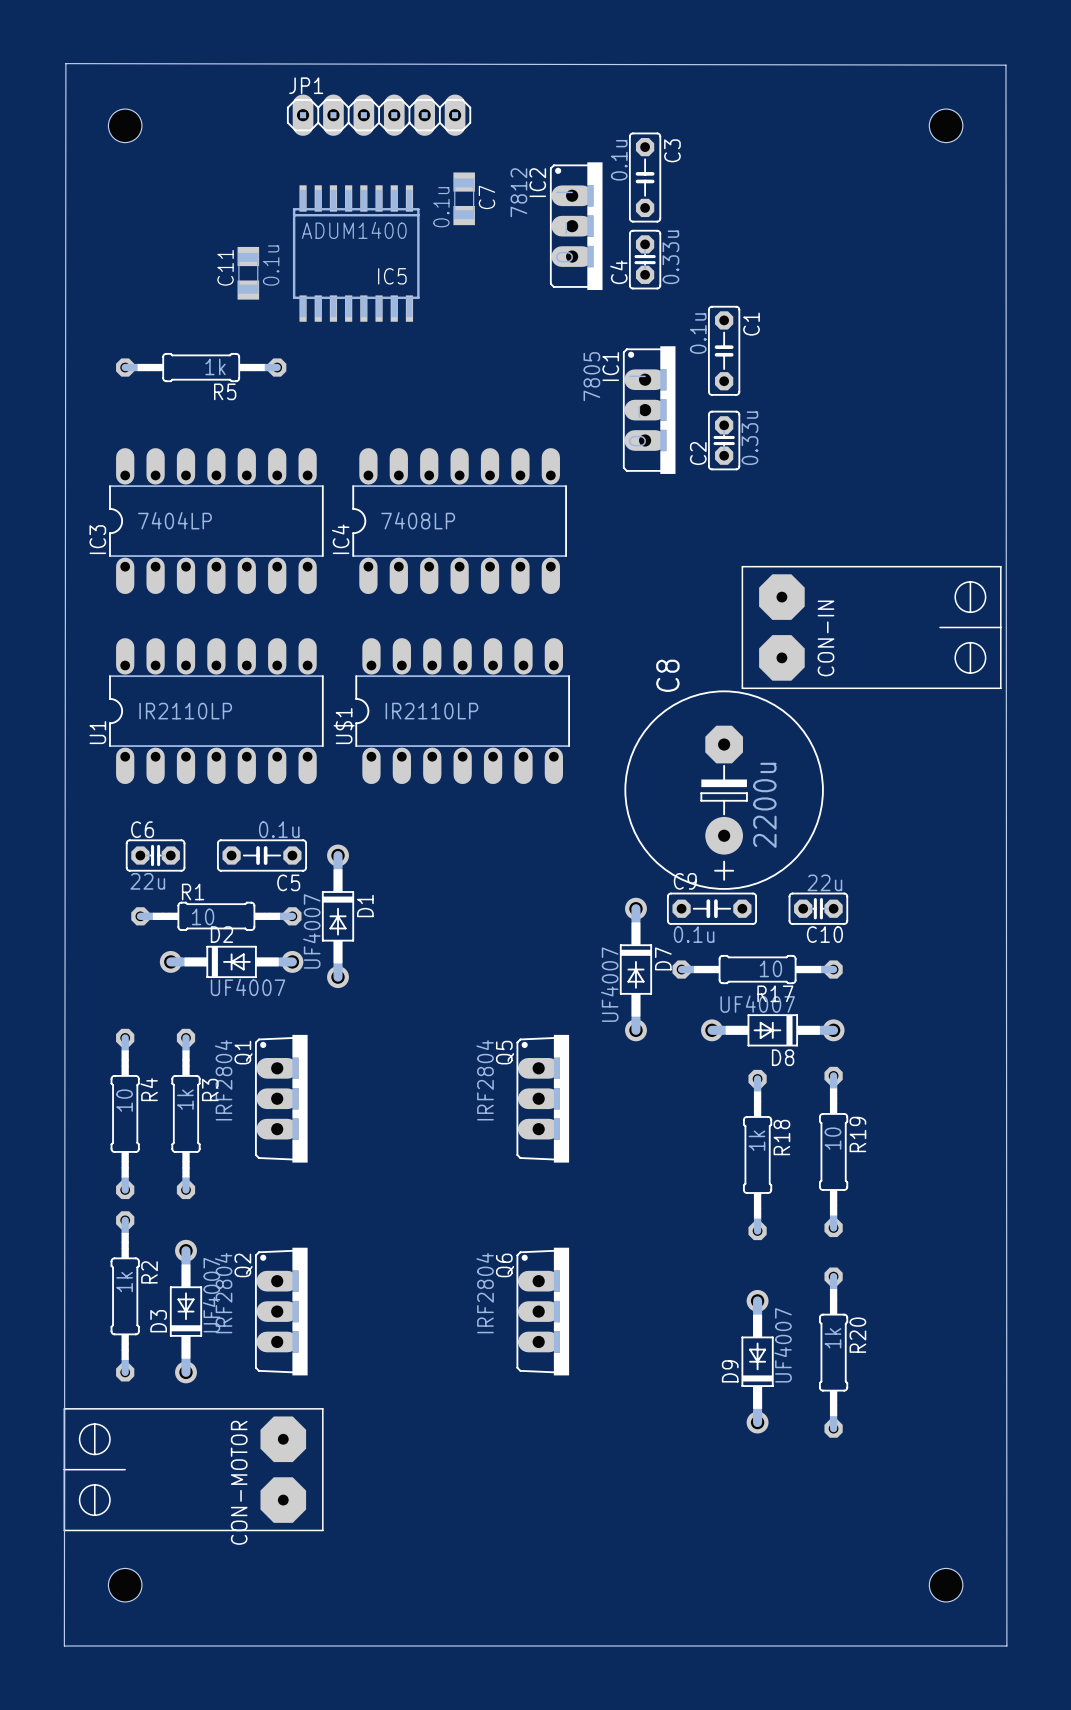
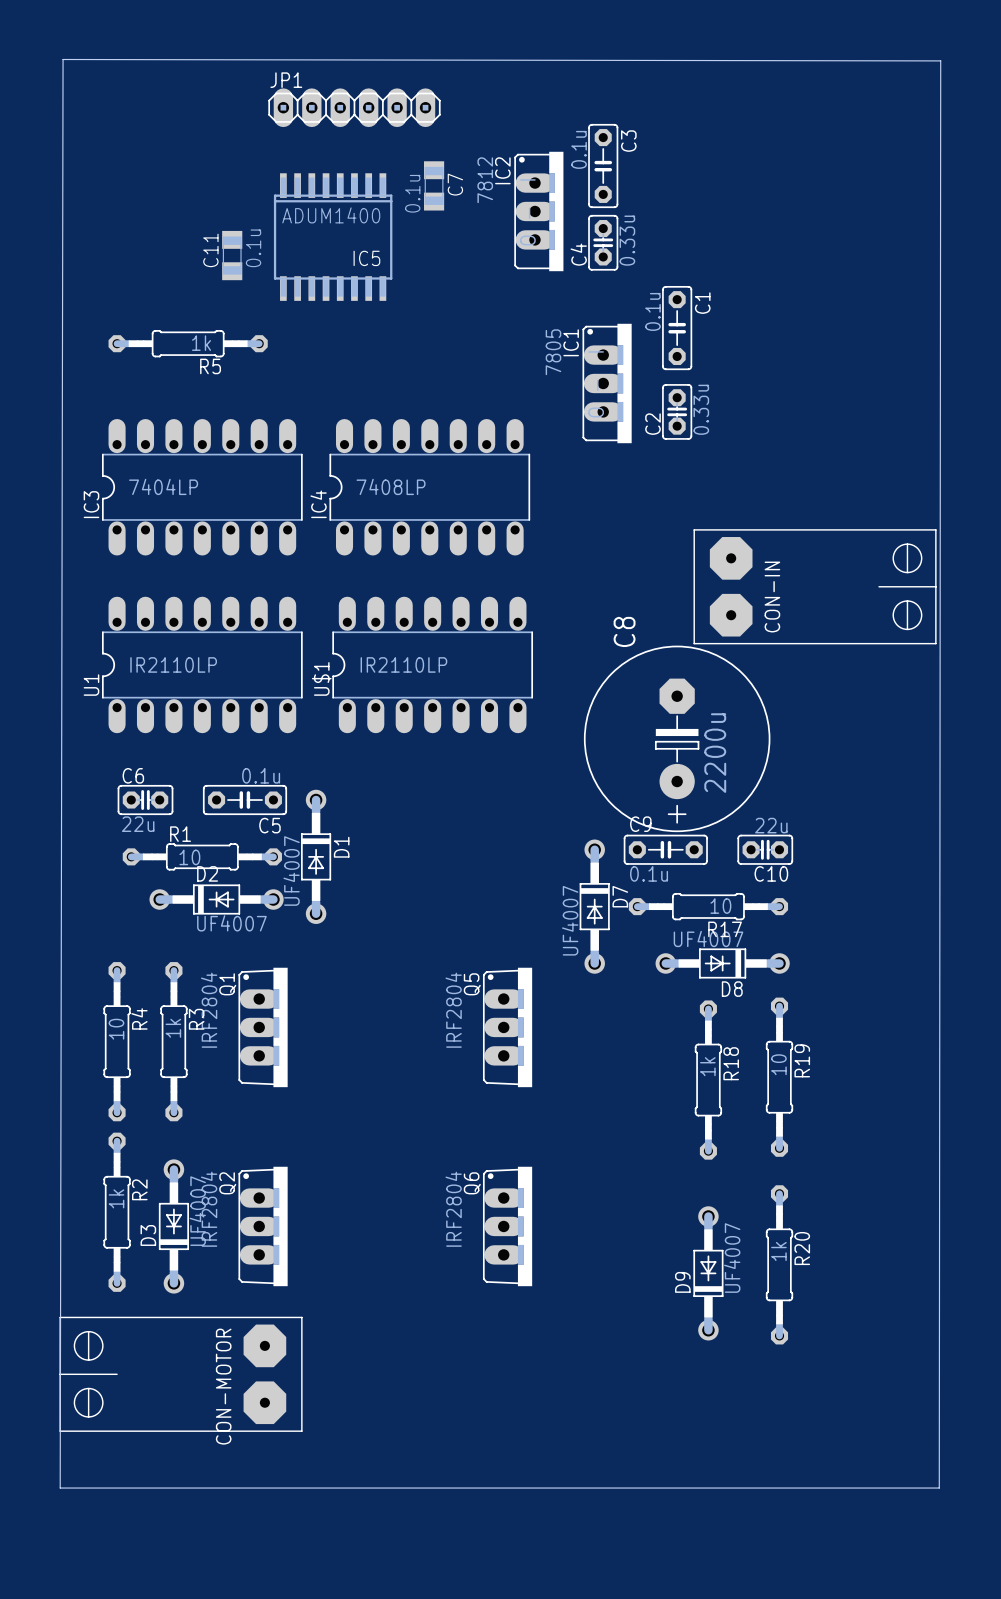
board edge: (67, 63) (65, 63) (64, 1646) (1006, 1646) (1005, 65) -> (63, 59) (60, 1488) (939, 1488) (940, 60)
hole: (125, 125) -> none
hole: (946, 125) -> none
hole: (125, 1585) -> none
hole: (946, 1585) -> none

